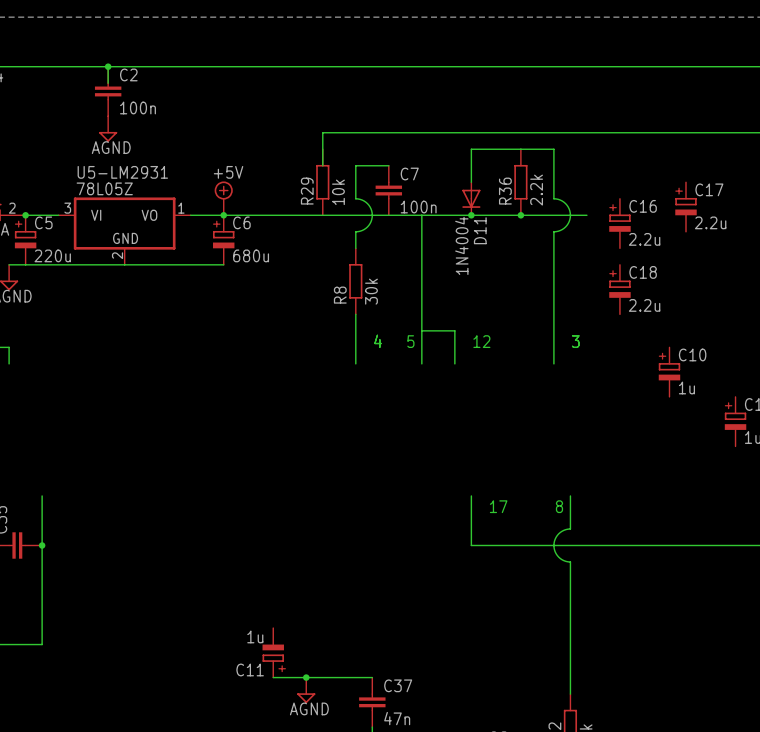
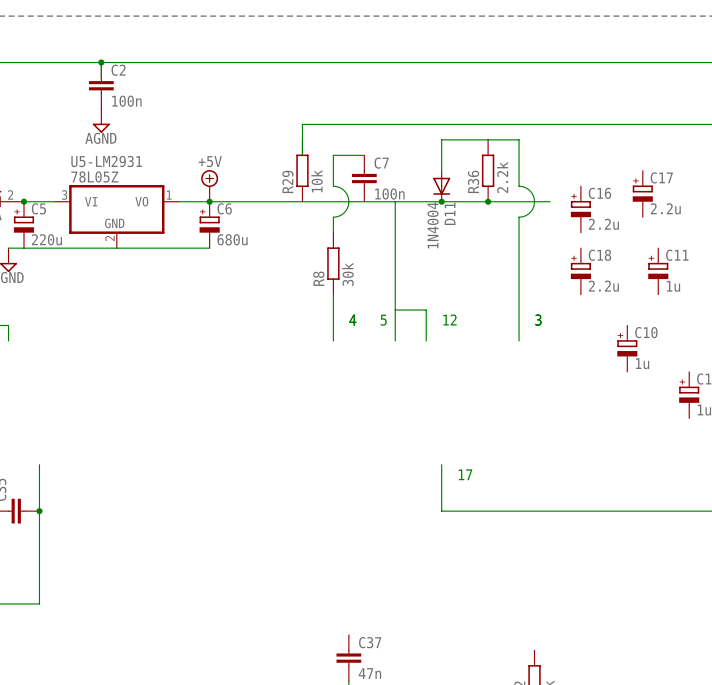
wire: (570, 495) (570, 528) (558, 533) (553, 545) (558, 557) (570, 562) (570, 694) -> none
text: 8 (559, 506) -> none
C11 symbol: [262, 628, 284, 678] -> [648, 248, 669, 295]
C11 value position: 1u (255, 636) -> 1u (673, 286)
C11 name position: C11 (250, 669) -> C11 (677, 255)
wire: (273, 677) (372, 677) -> none
junction: (306, 677) -> none
power symbol: AGND (306, 690) -> none

